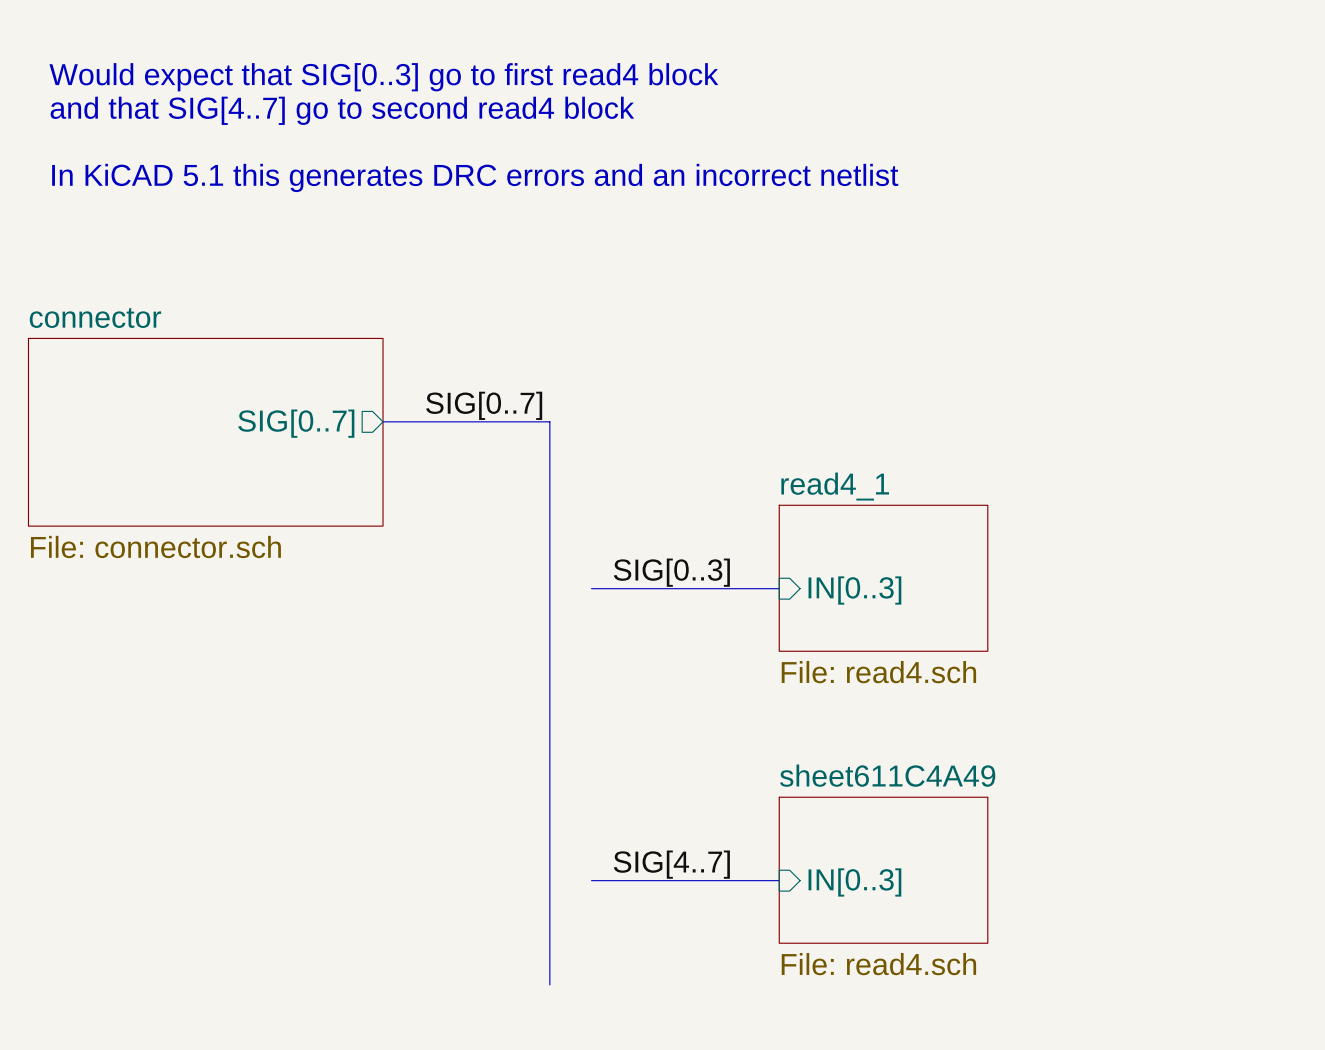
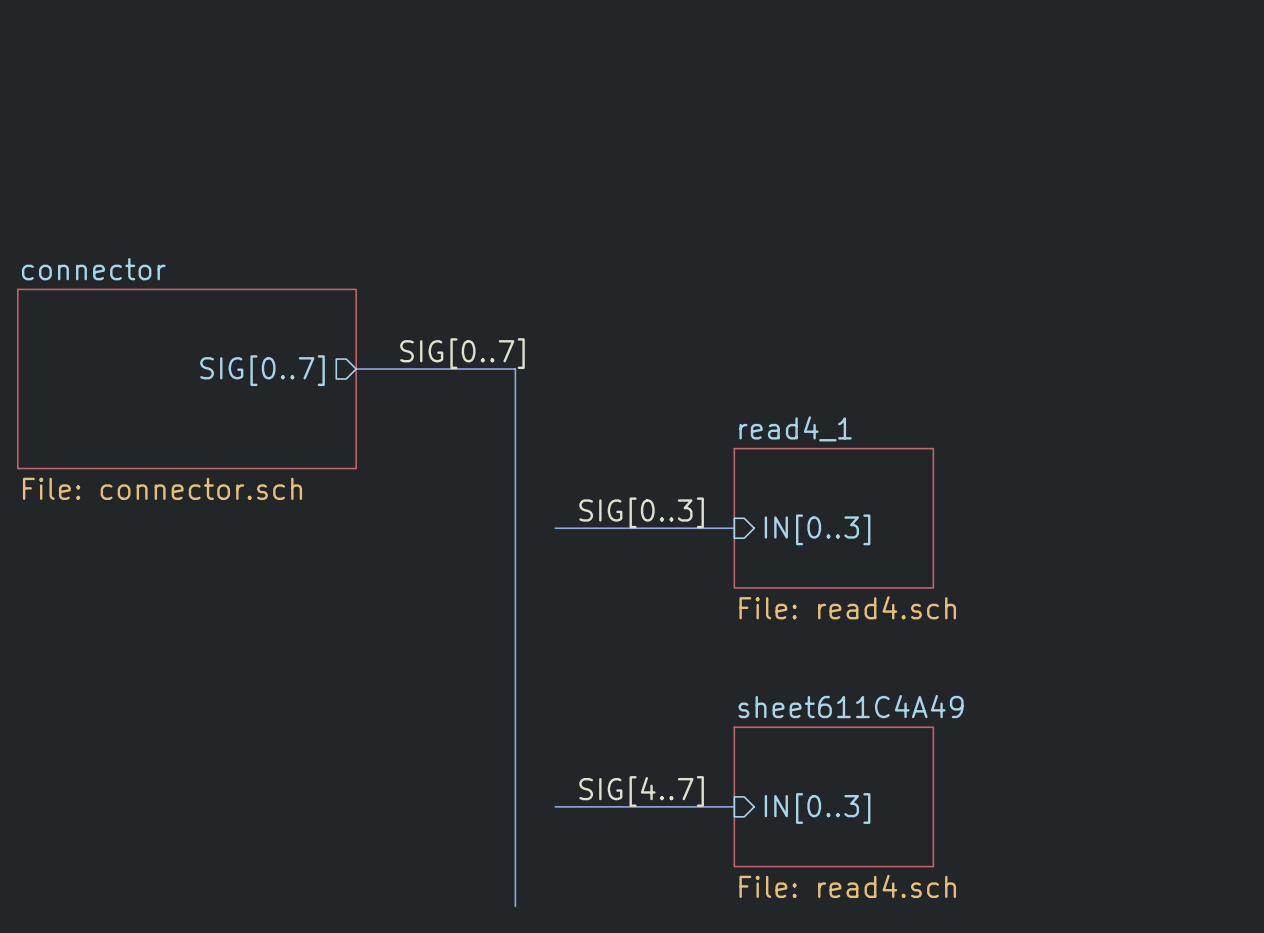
text: Would expect that SIG[0..3] go to first read4 block (383, 77) -> none
text: and that SIG[4..7] go to second read4 block (342, 110) -> none
text: In KiCAD 5.1 this generates DRC errors and an incorrect netlist (475, 177) -> none

